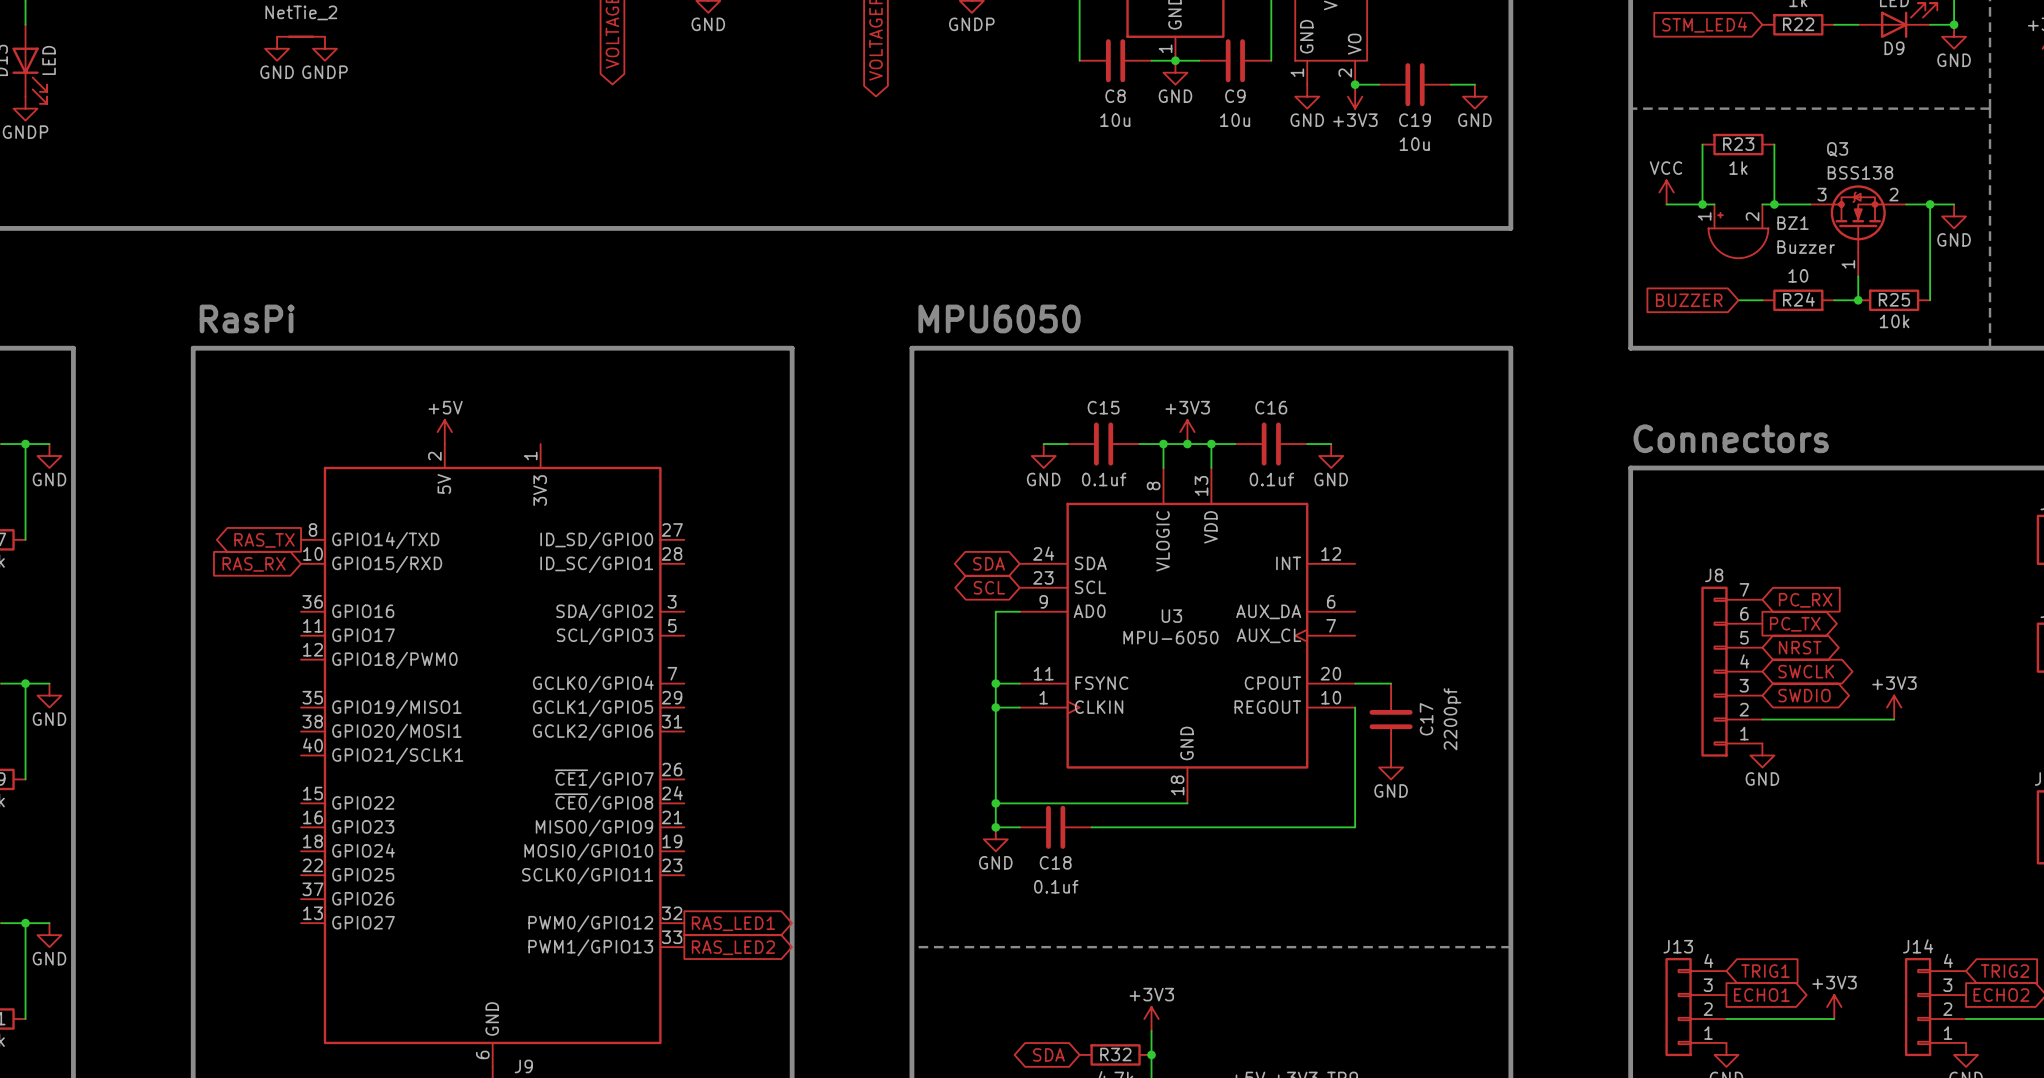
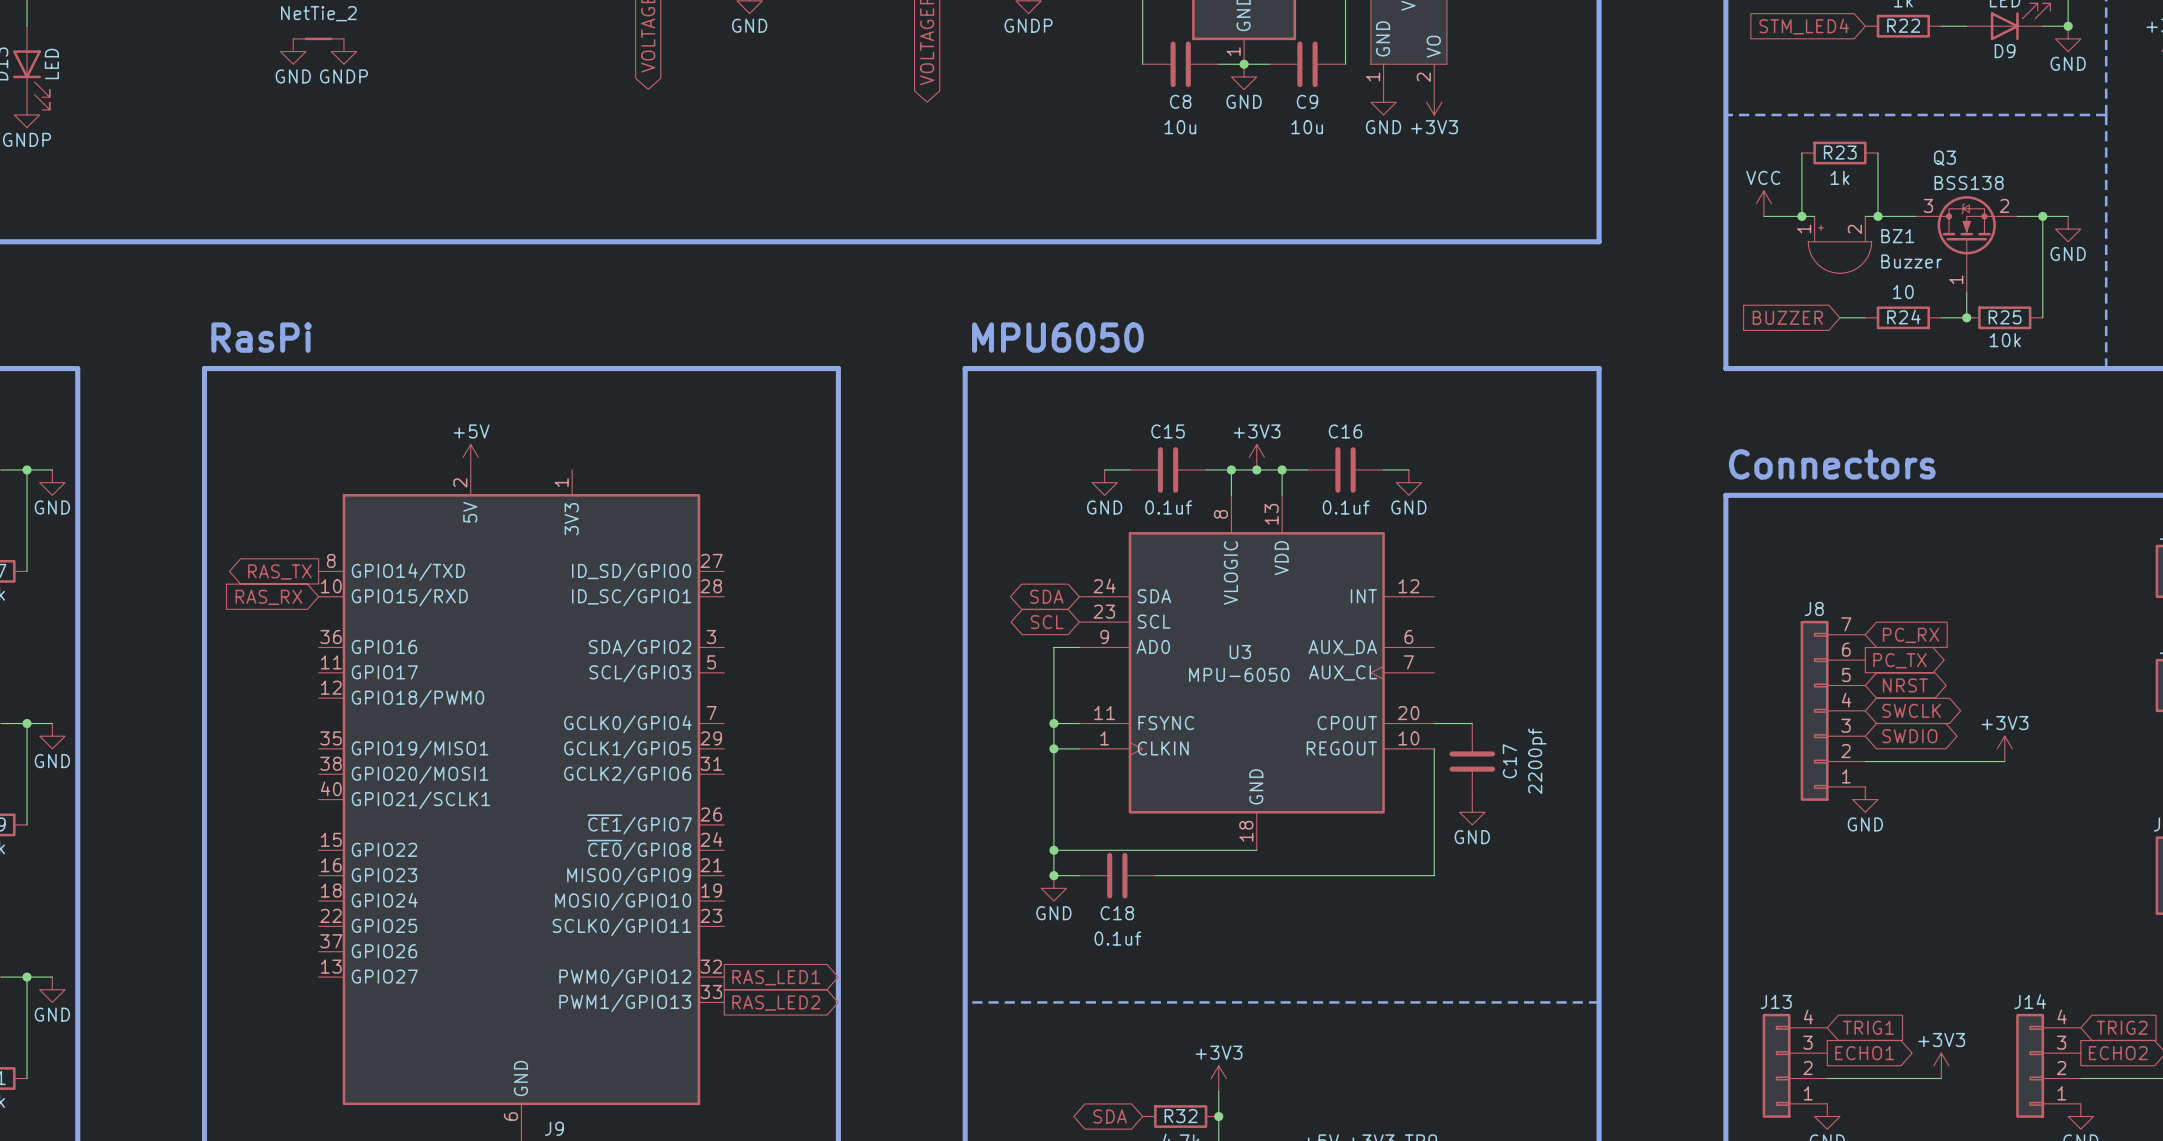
wire: (1355, 84) (1379, 84) -> none
junction: (1355, 84) -> none
C19: 10u (1415, 84) -> none
wire: (1450, 84) (1474, 84) -> none
power symbol: GND (1474, 96) -> none

